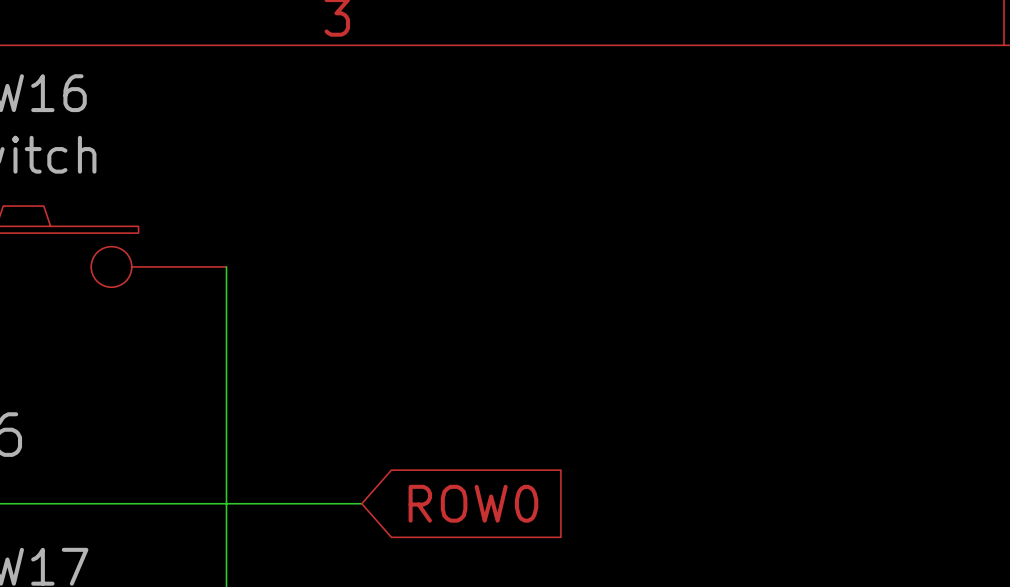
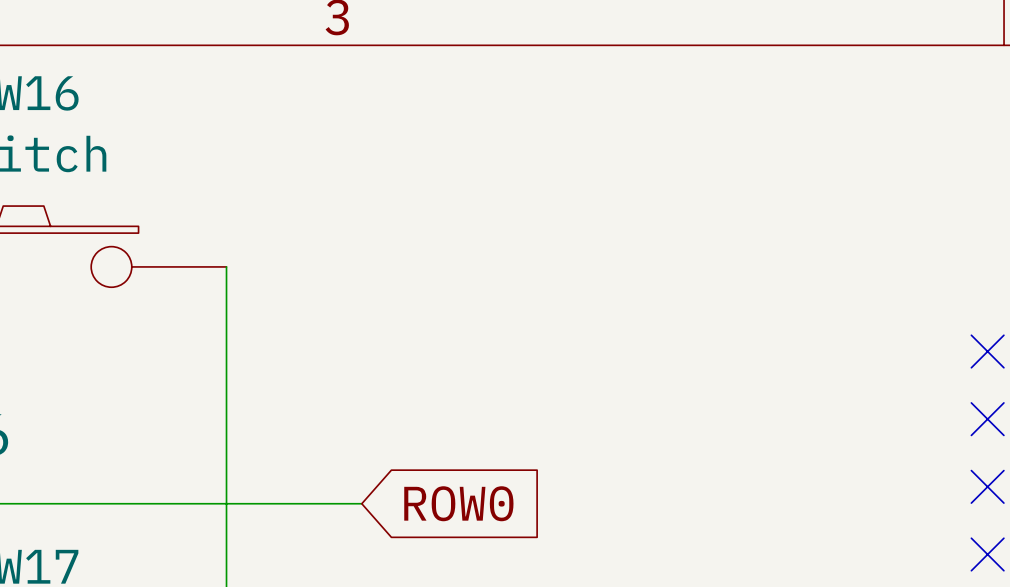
no-connect mark: none -> (987, 351)
no-connect mark: none -> (987, 419)
no-connect mark: none -> (987, 486)
no-connect mark: none -> (987, 554)

